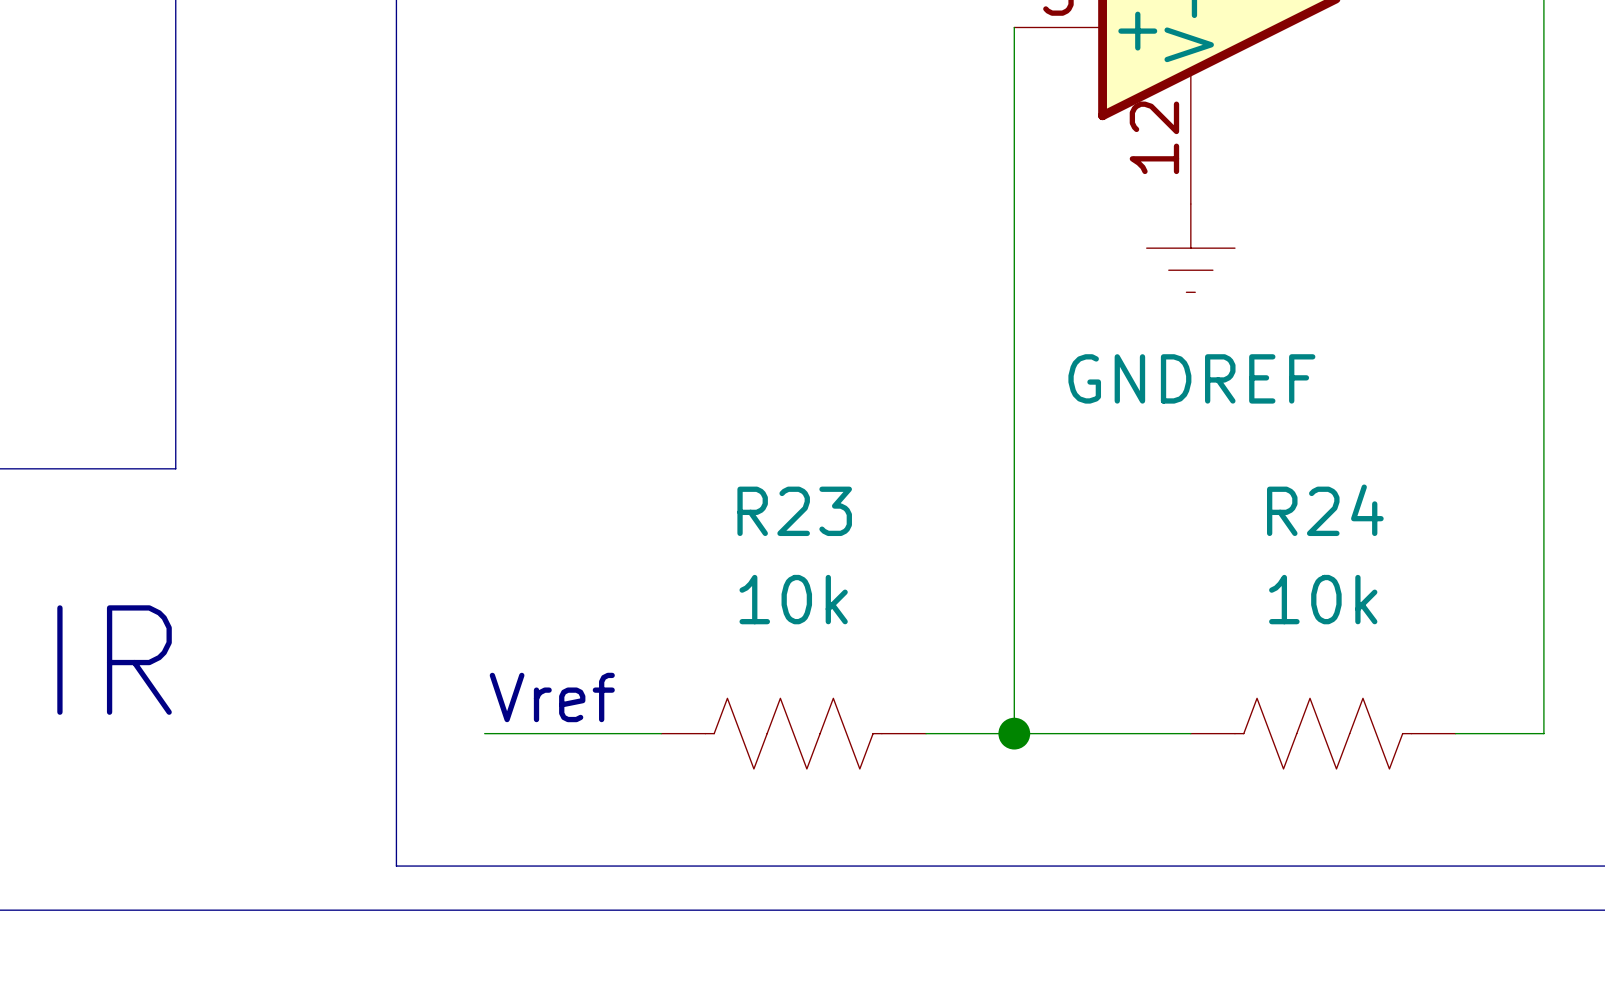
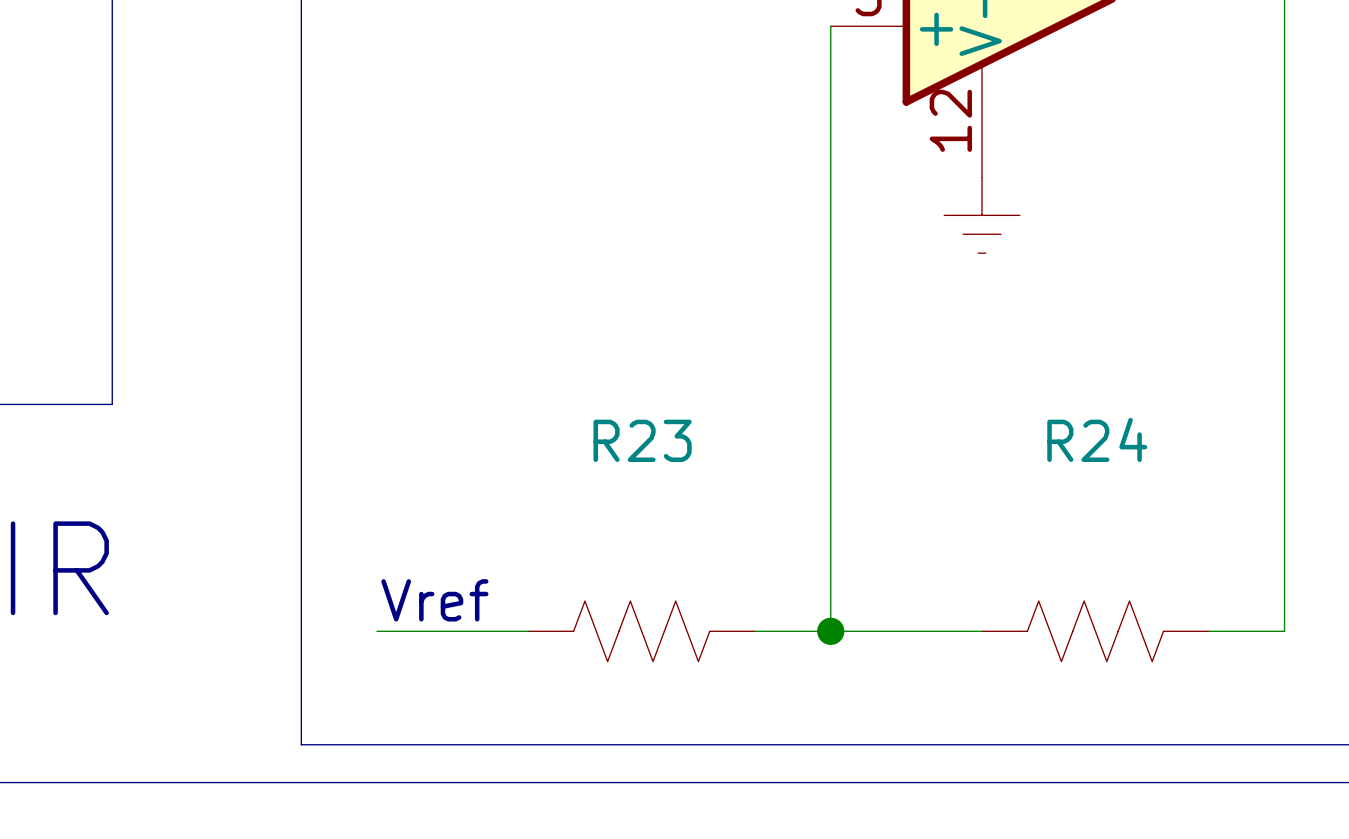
power symbol text: GNDREF (1191, 378) -> none
R23 value: 10k (793, 599) -> none
R24 value: 10k (1323, 599) -> none

